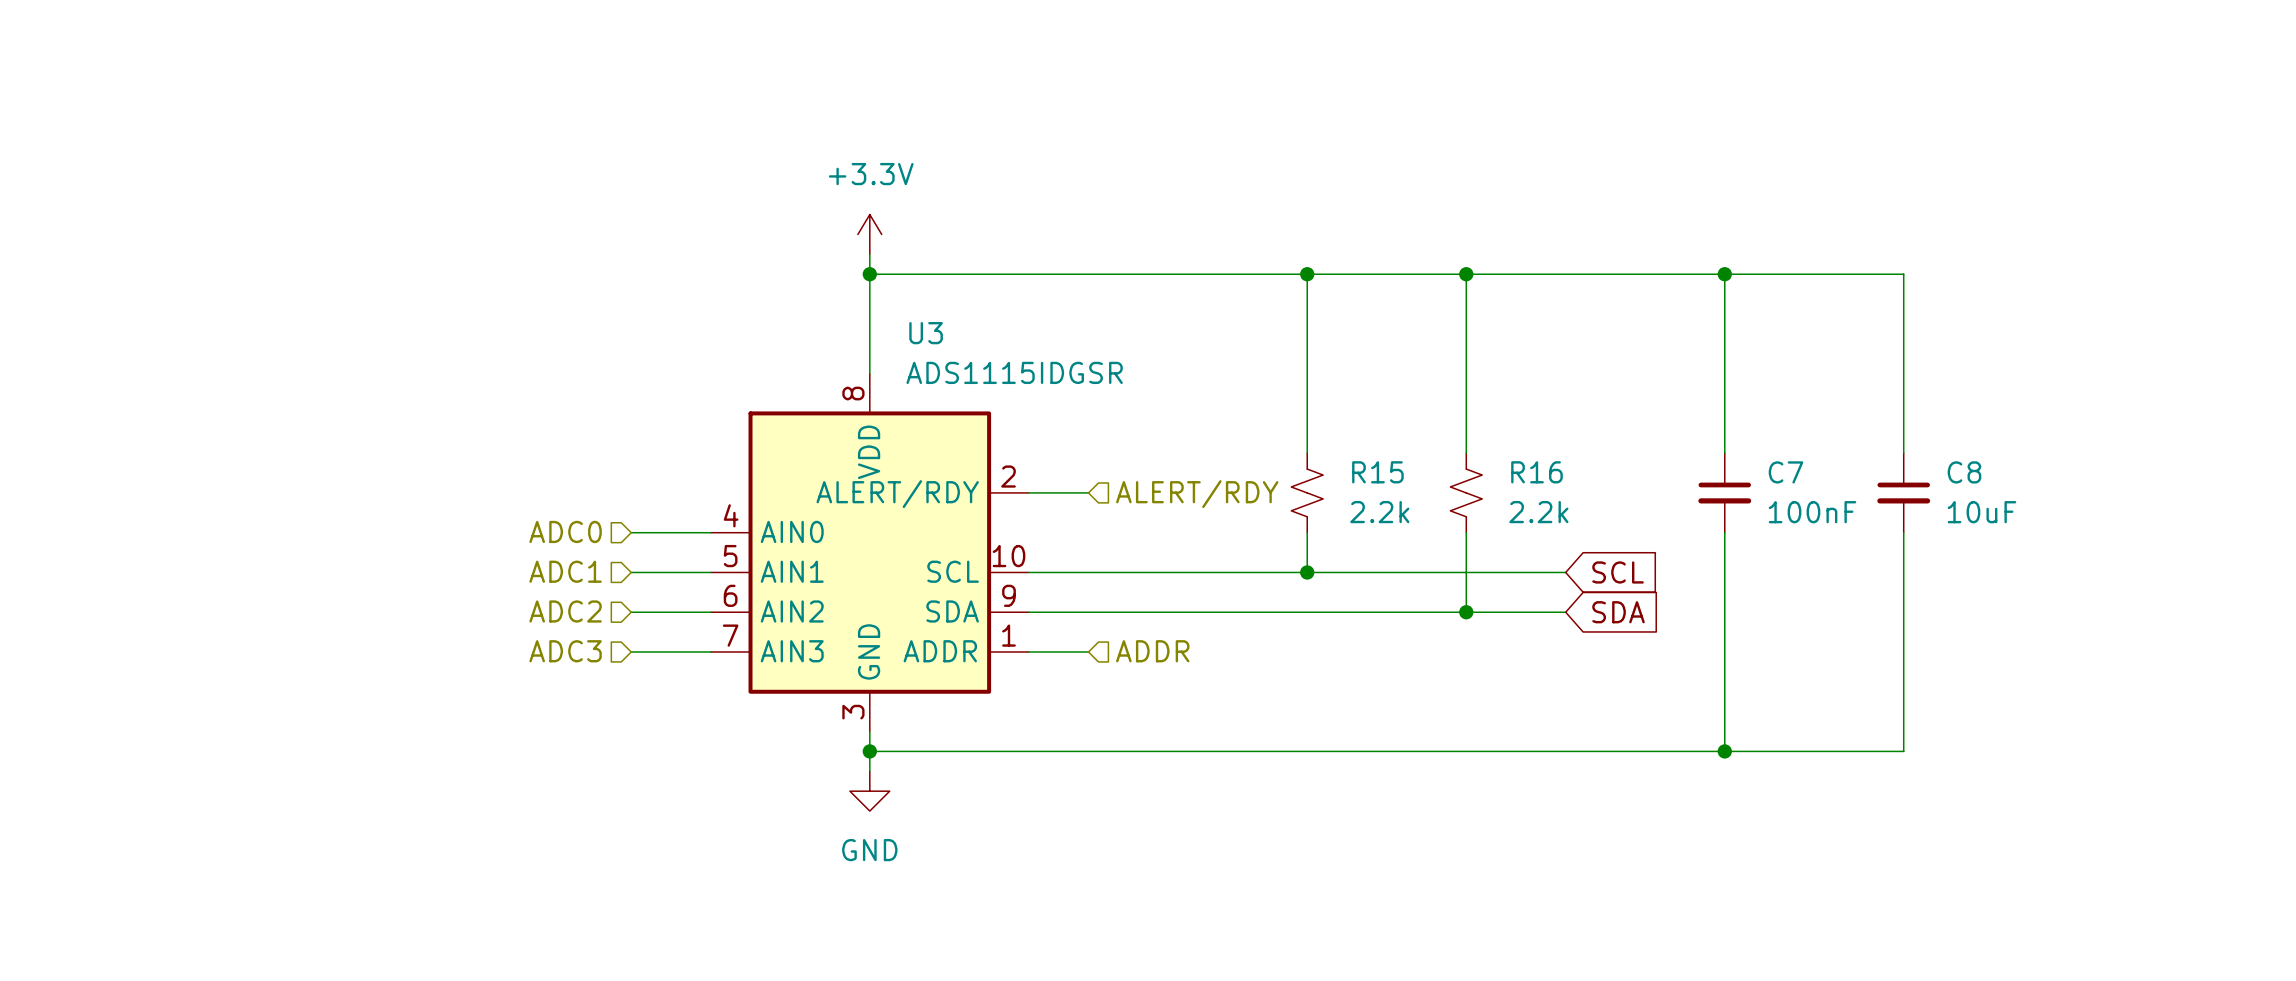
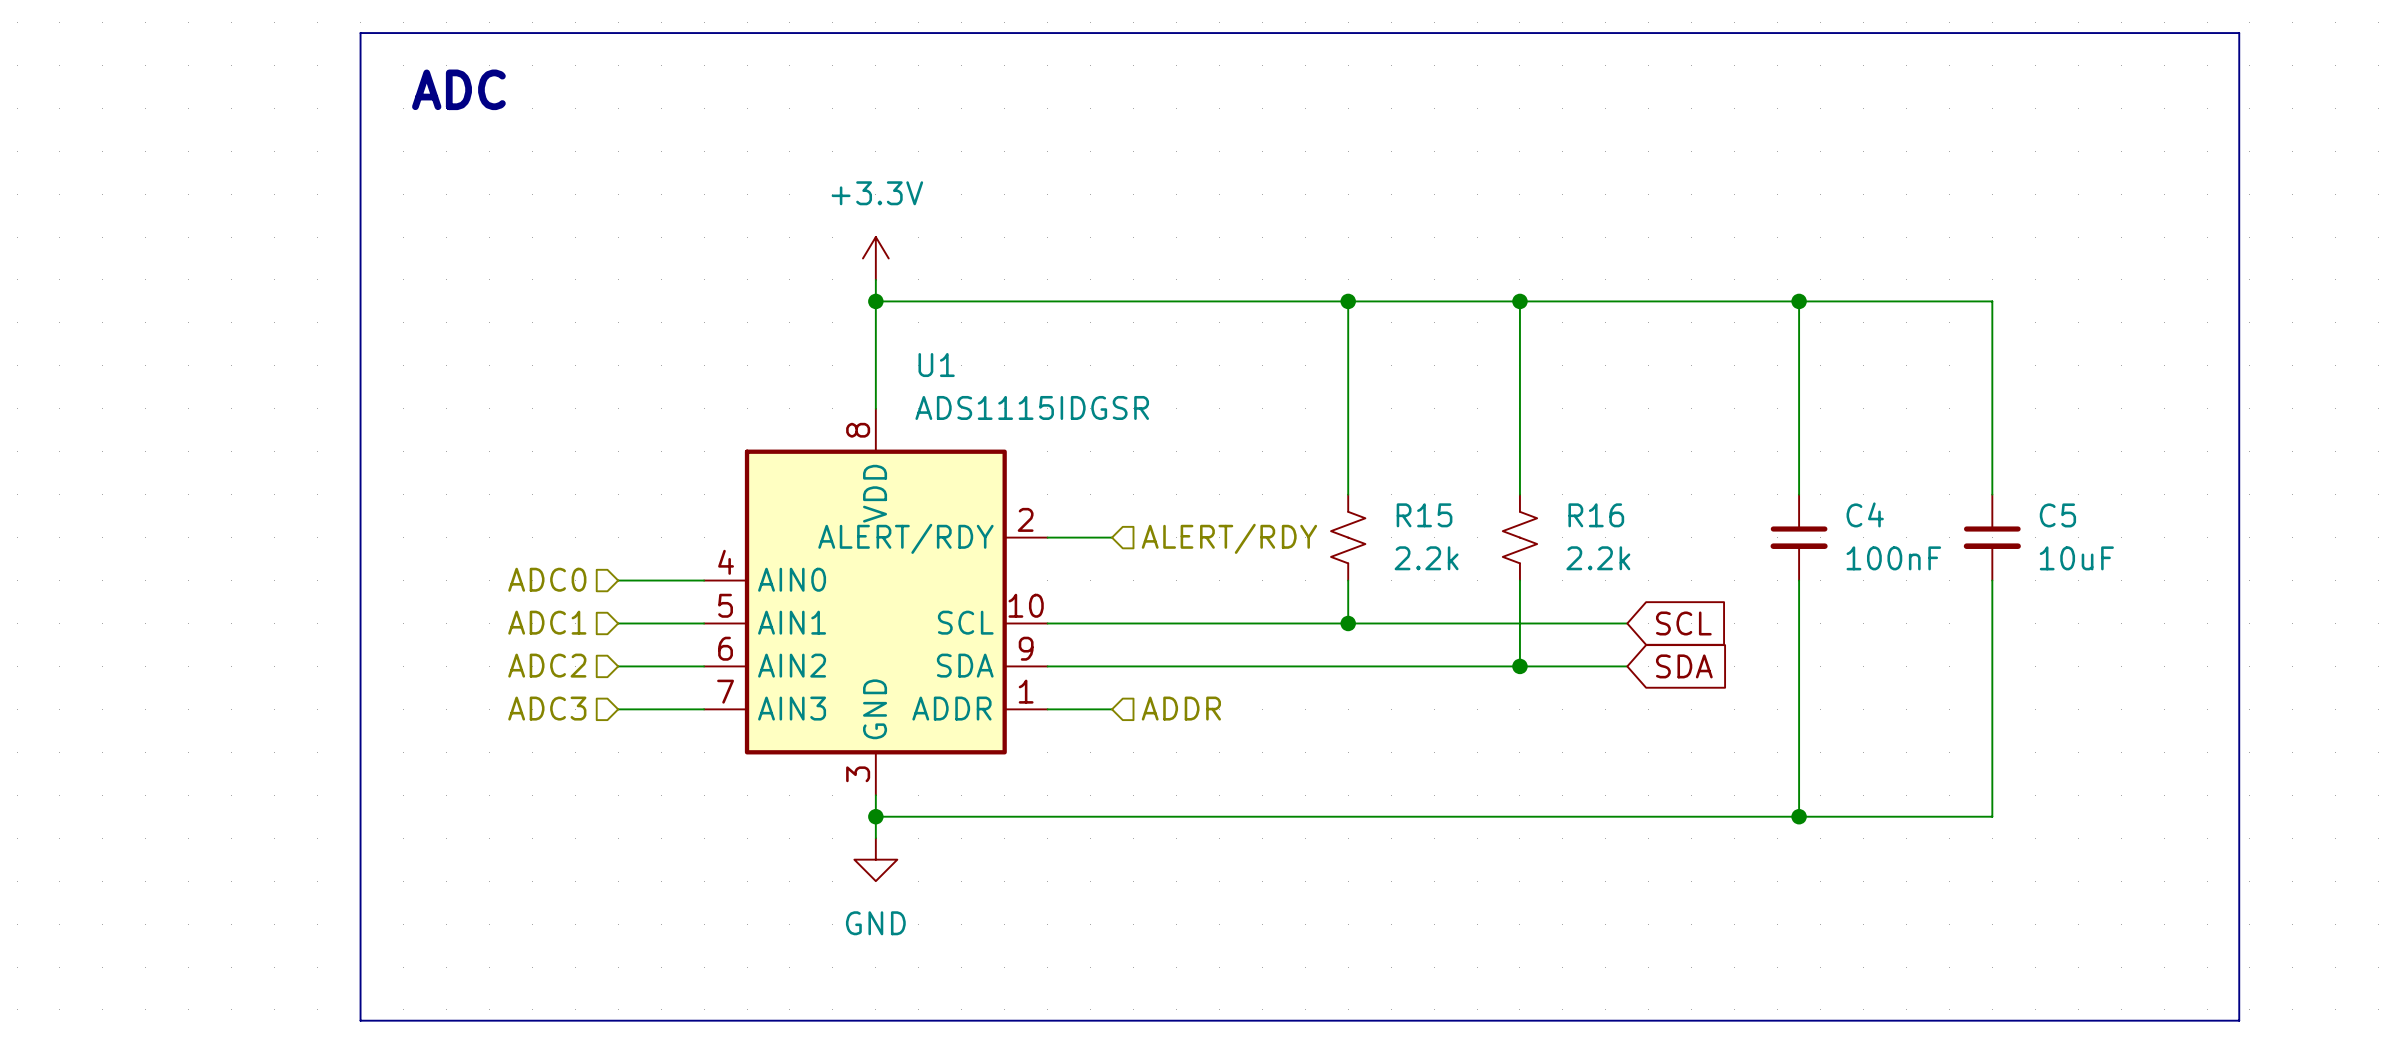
line: none -> (360, 33) (2239, 33) (2239, 1020) (360, 1020) (360, 33)
text: none -> ADC (458, 89)
U3 name: U3 (926, 333) -> U1 (936, 365)
C7 name: C7 (1785, 472) -> C4 (1865, 514)
C8 name: C8 (1964, 472) -> C5 (2057, 515)

